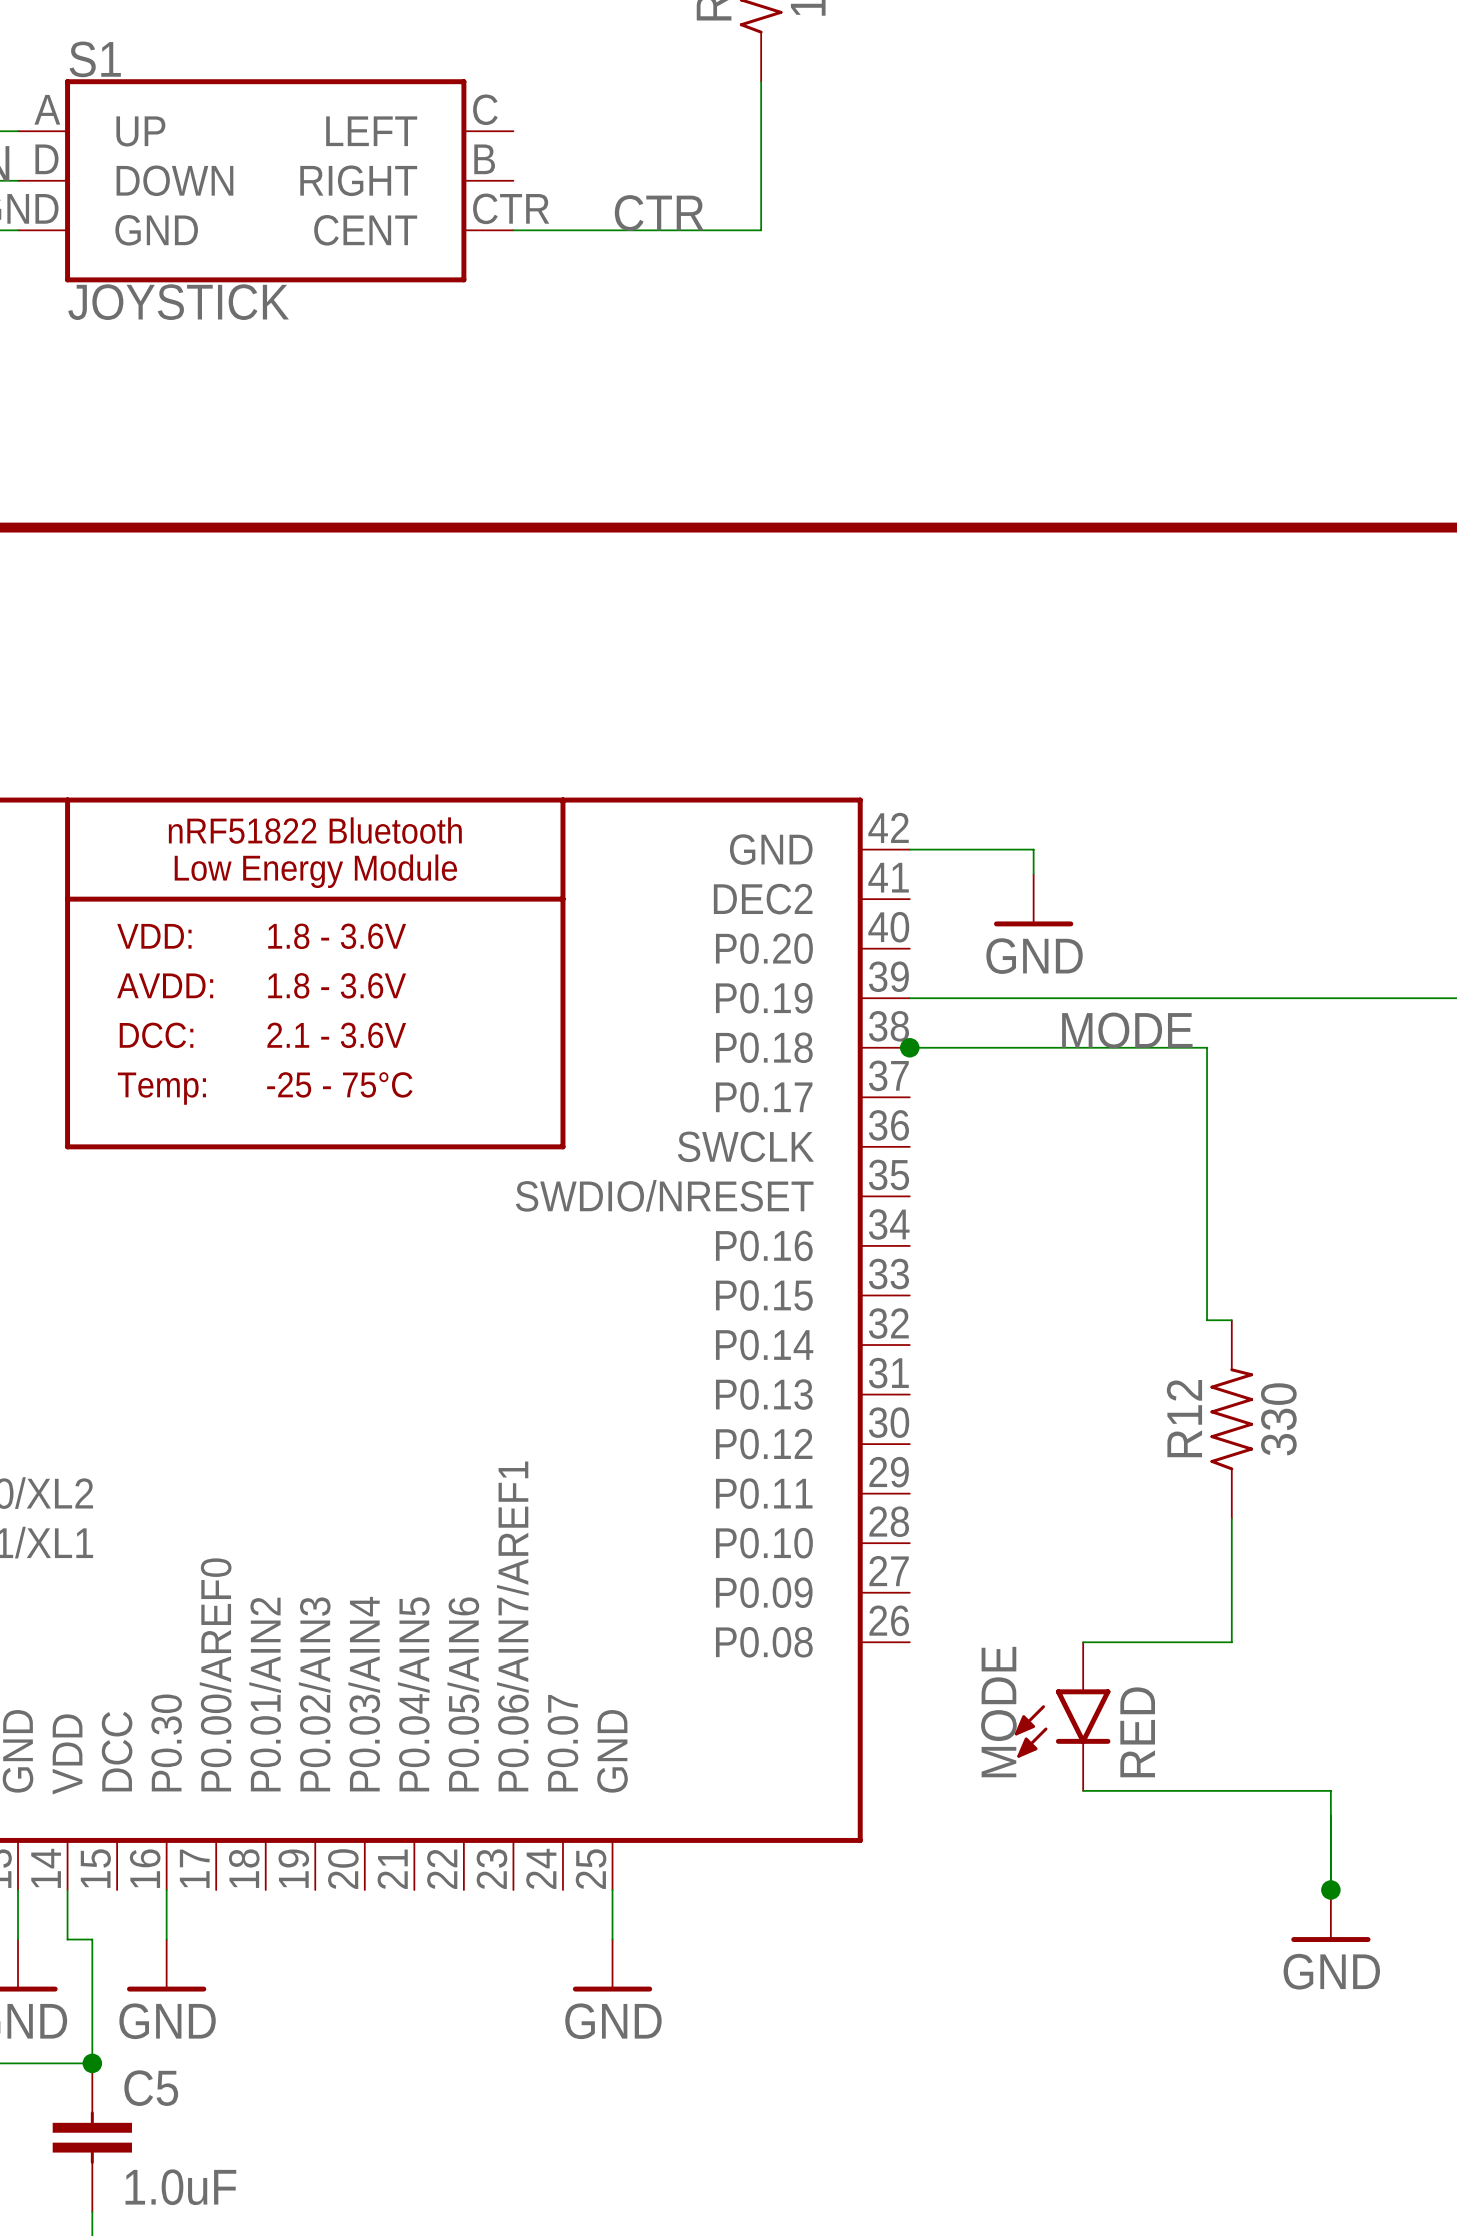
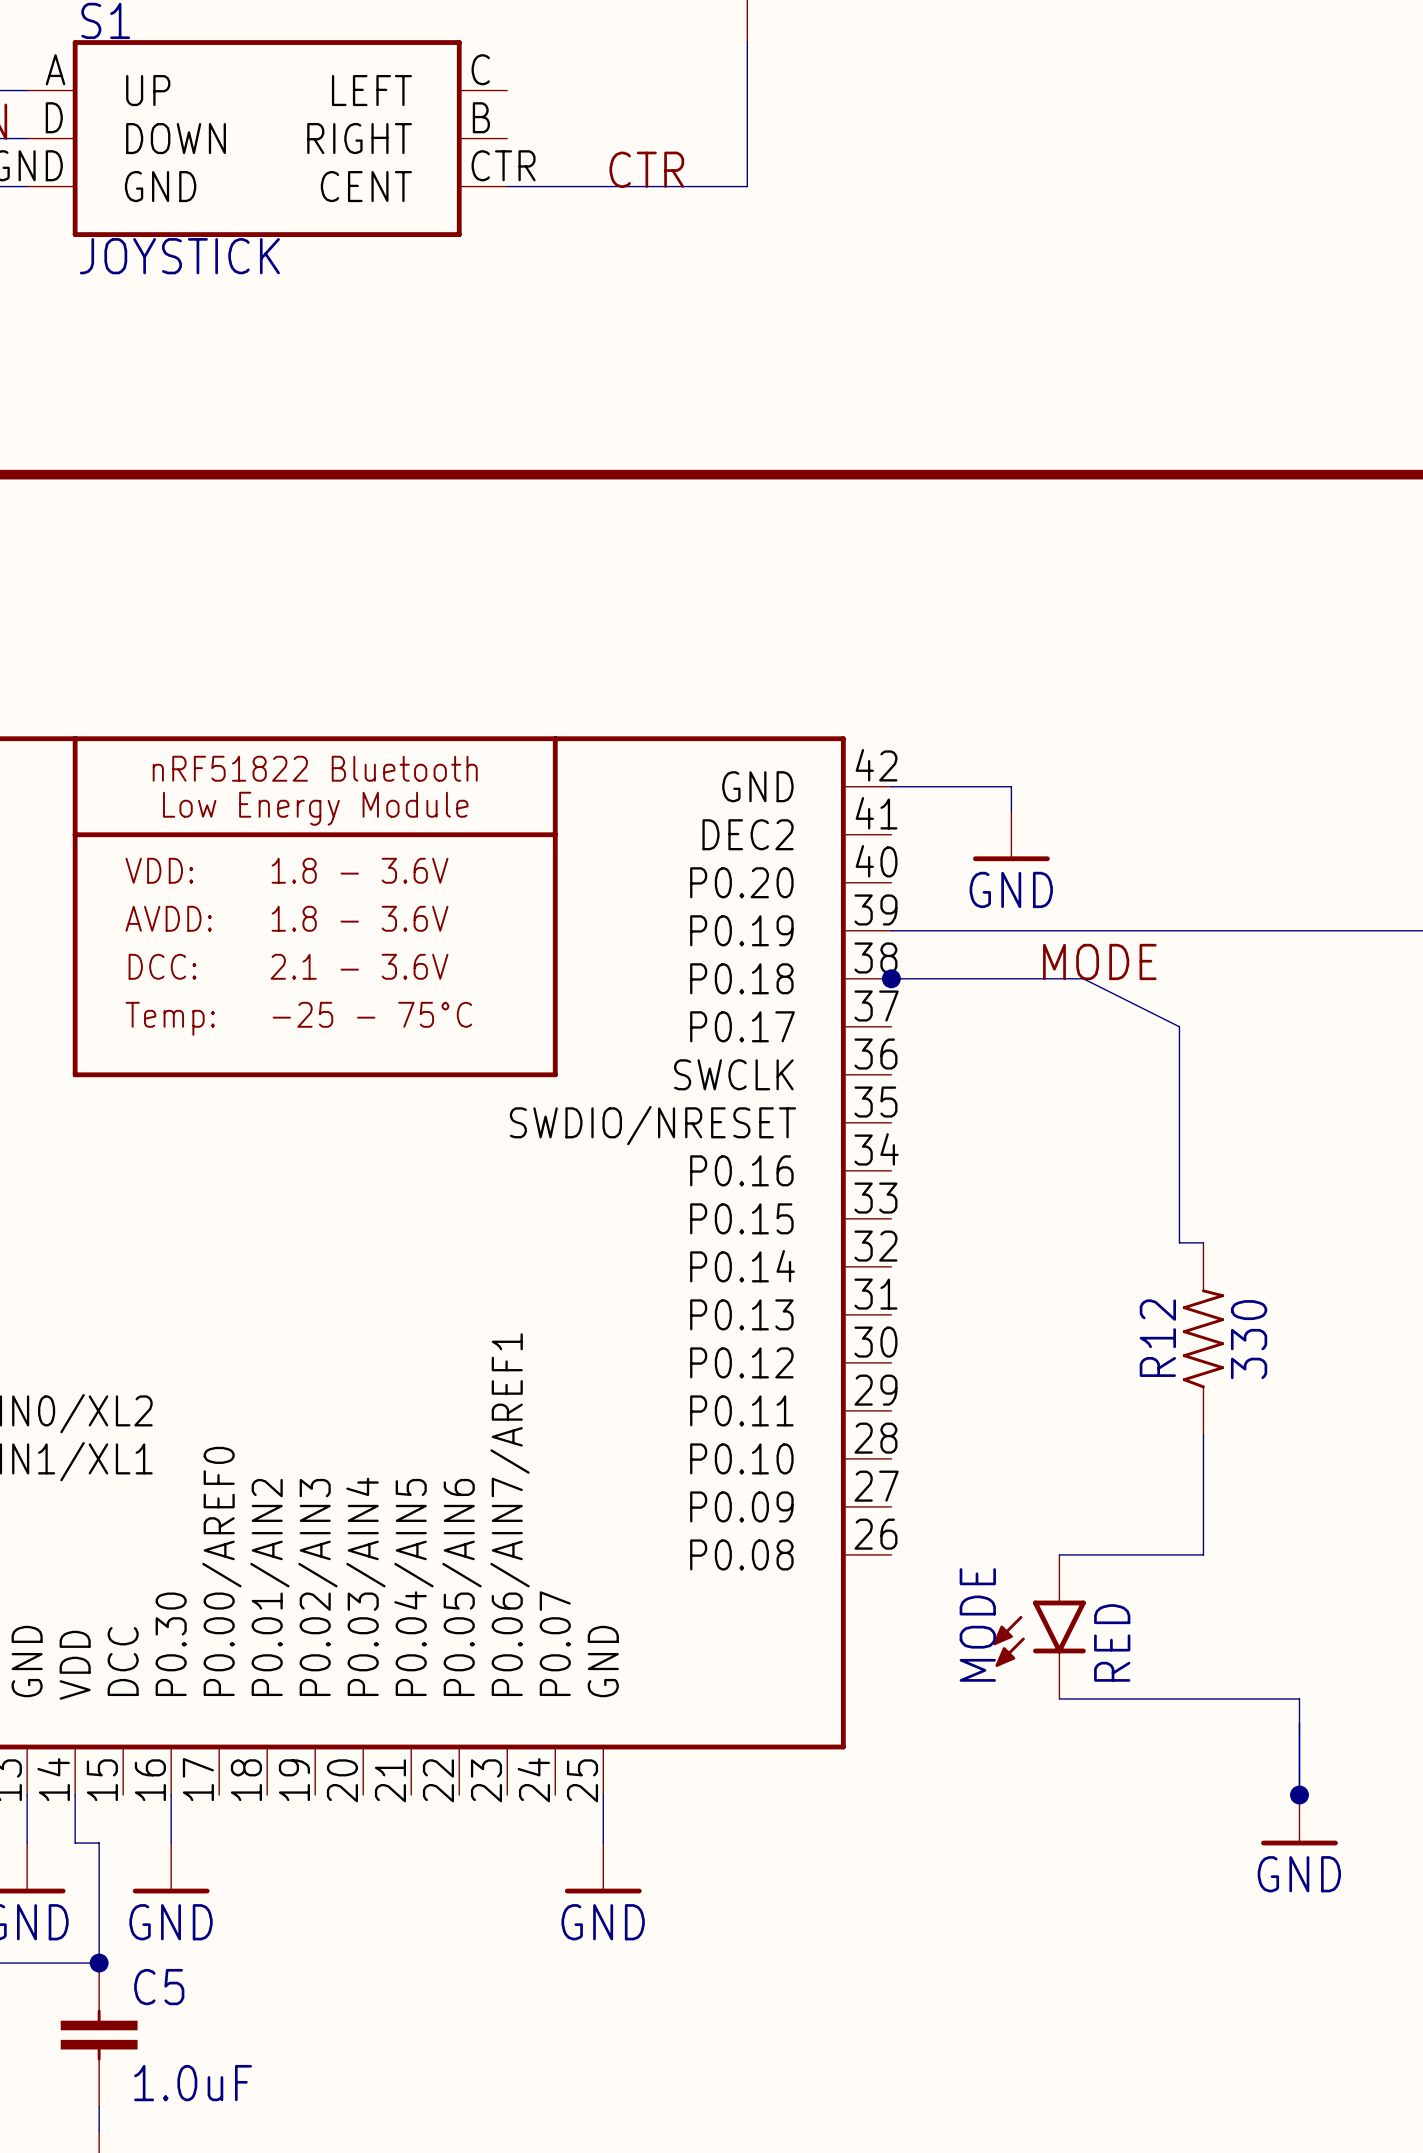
wire: (1107, 1047) (1207, 1047) (1207, 1097) -> (1083, 978) (1179, 1026)

